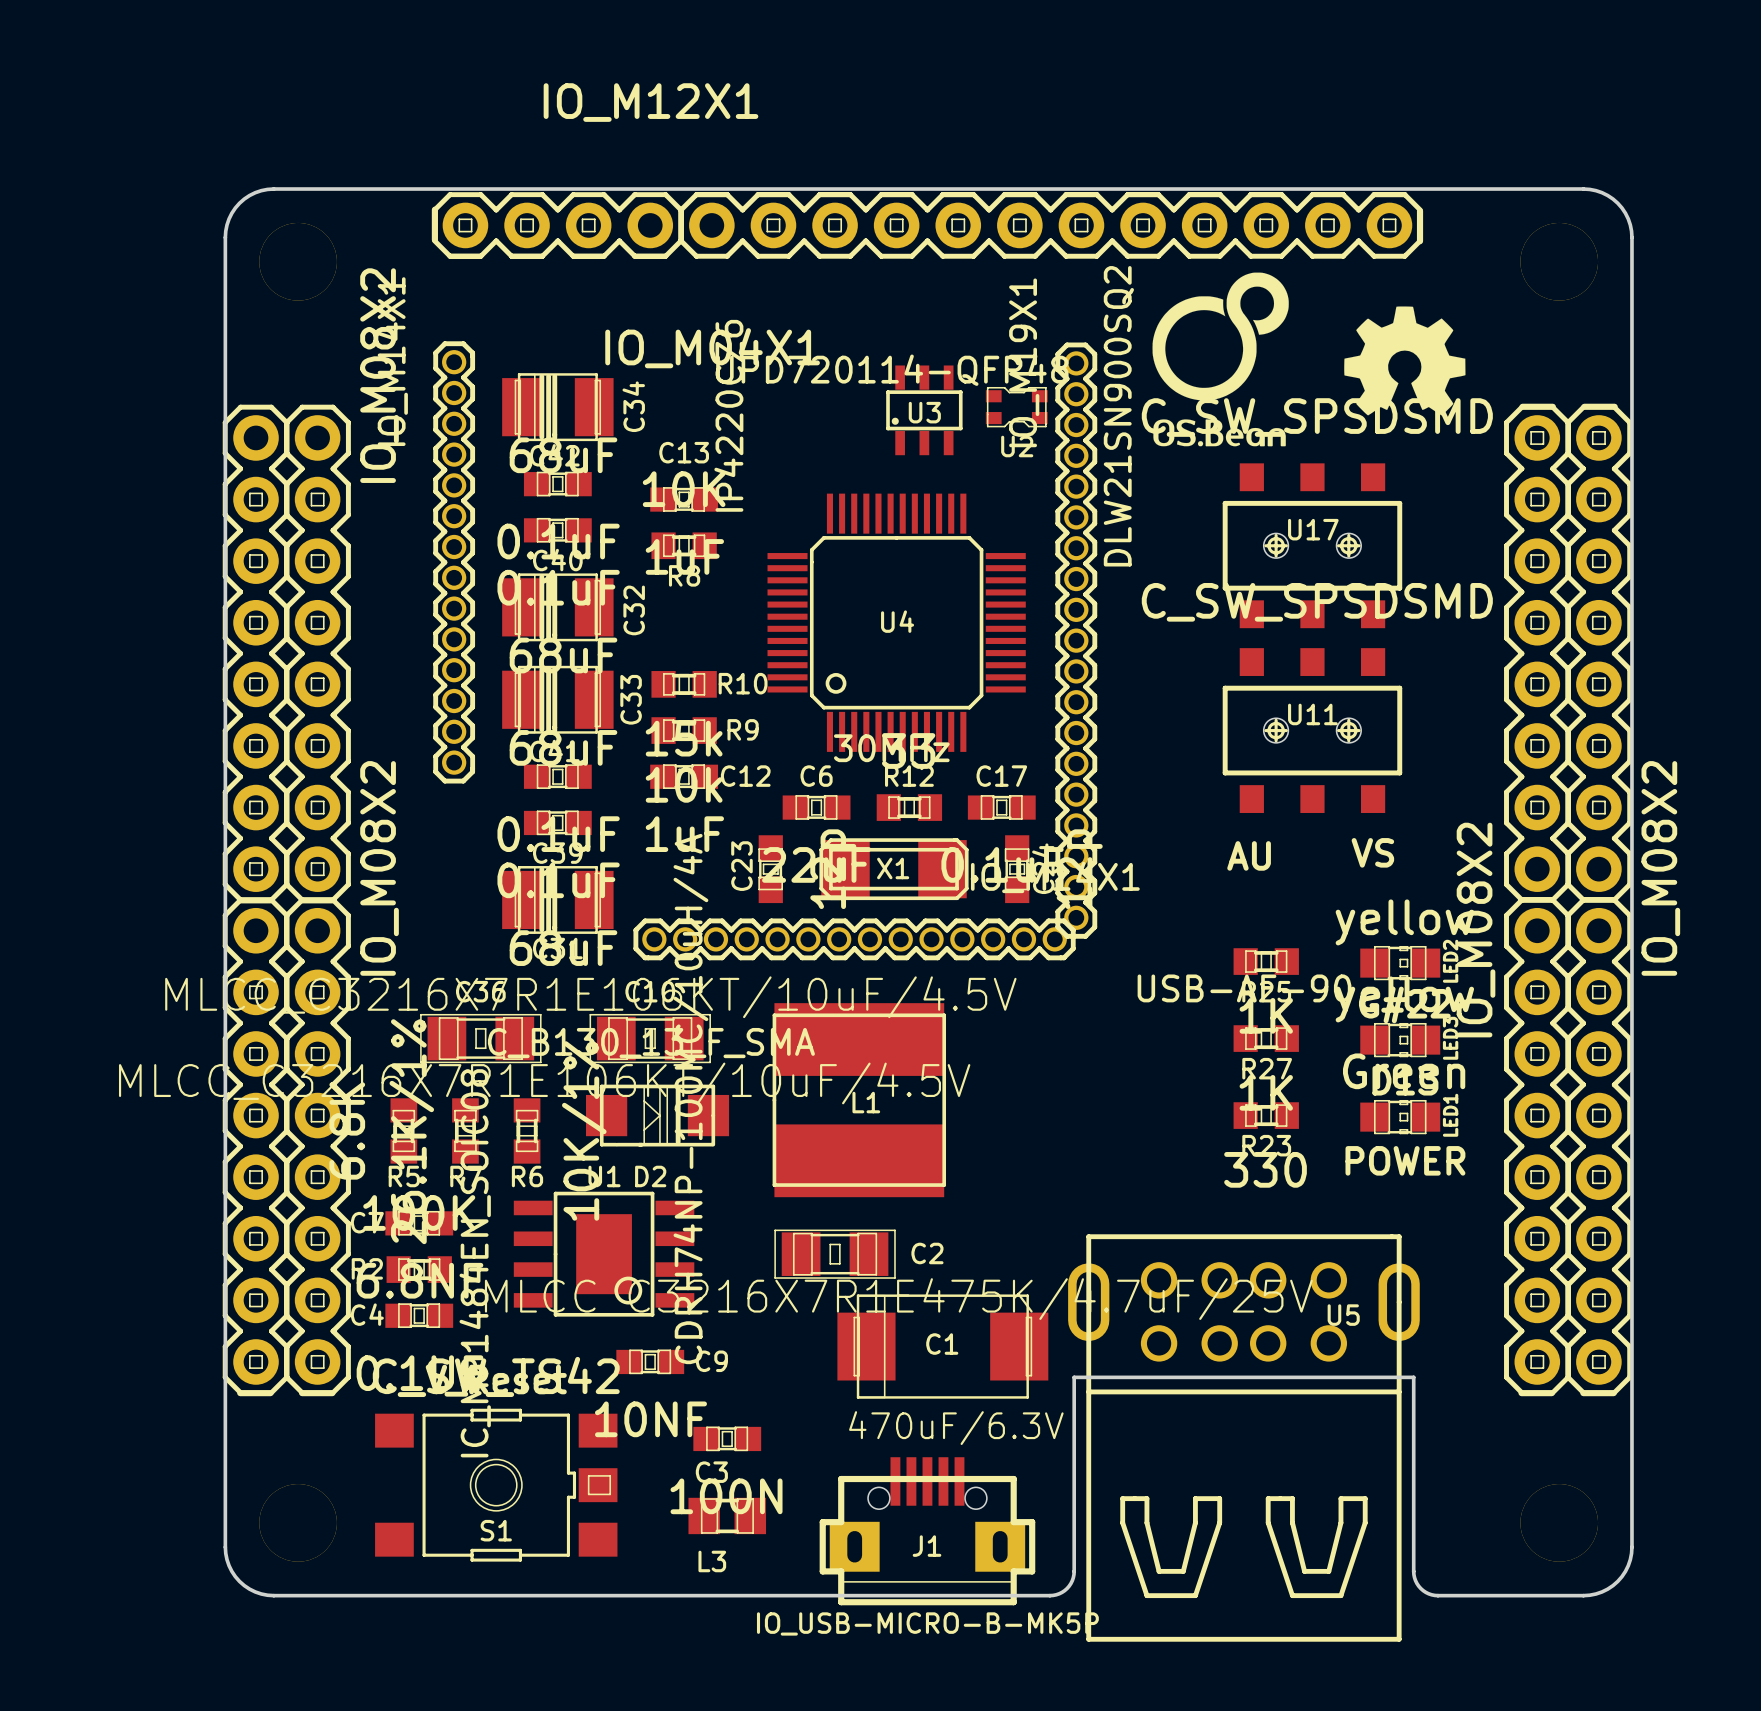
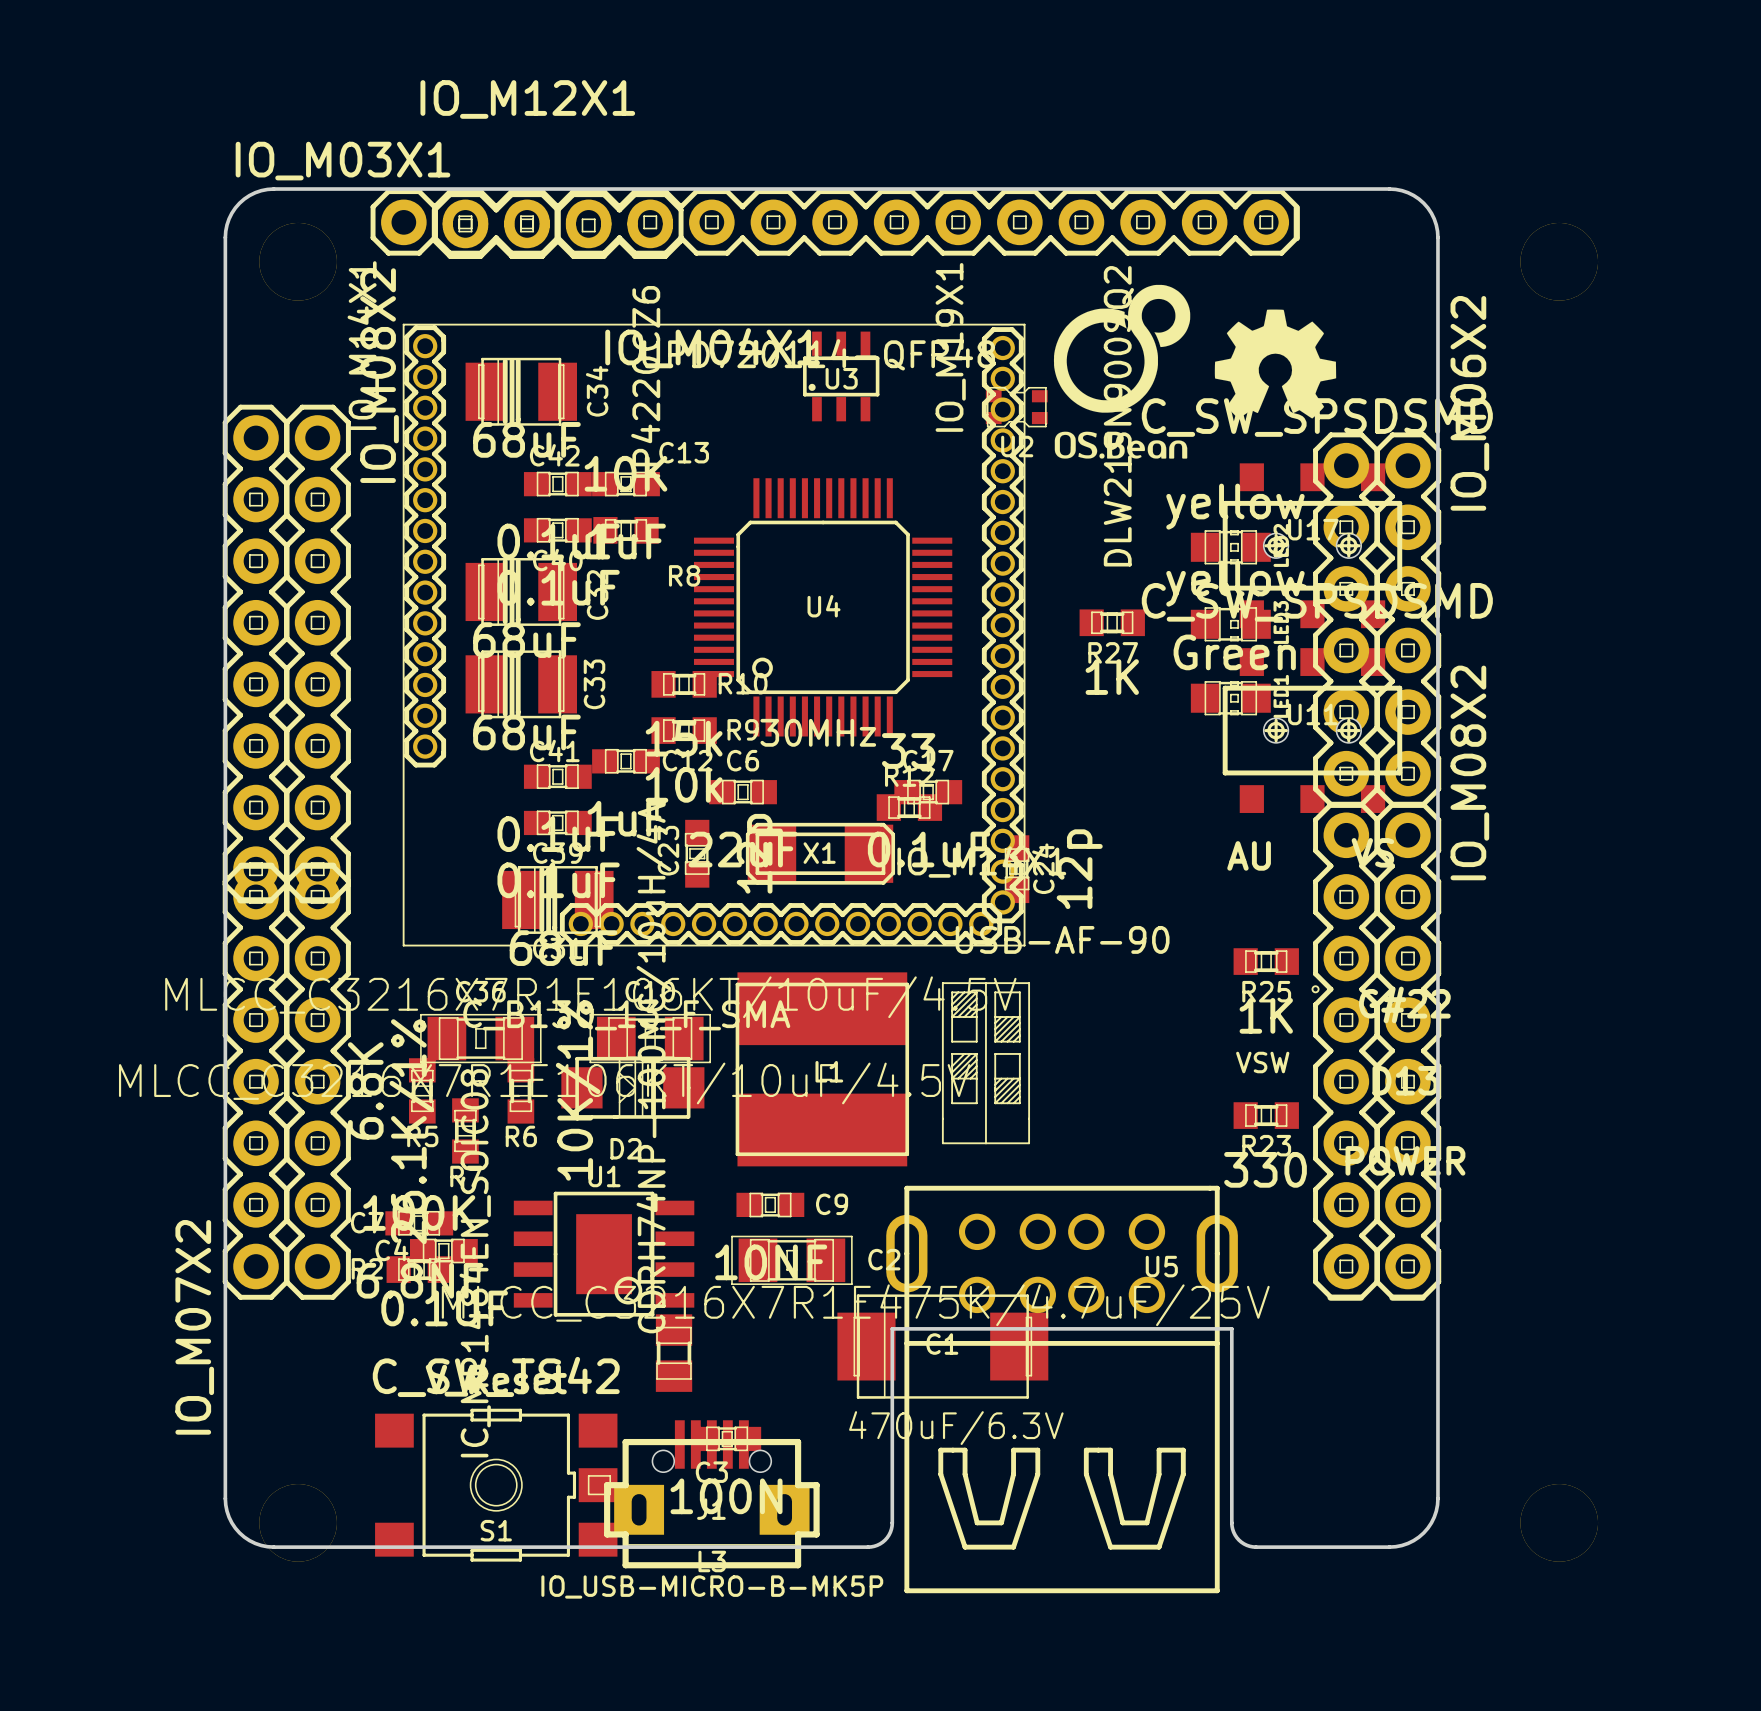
board edge: (1389, 189) (1589, 189) (1607, 195) (1617, 203) (1628, 218) (1631, 231) (1631, 1547) (1628, 1565) (1617, 1581) (1602, 1591) (1583, 1595) (1437, 1595) (1428, 1593) (1420, 1588) (1415, 1580) (1413, 1571) (1413, 1377) (1074, 1377) (1073, 1574) (1067, 1588) (1053, 1595) (267, 1595) (255, 1591) (244, 1585) (235, 1576) (229, 1565) (225, 1547) (225, 1498) -> (1389, 189) (1408, 192) (1423, 203) (1434, 218) (1437, 237) (1437, 1498) (1434, 1517) (1423, 1532) (1408, 1543) (1389, 1547) (1256, 1547) (1246, 1545) (1238, 1540) (1233, 1532) (1231, 1522) (1231, 1328) (892, 1328) (892, 1526) (885, 1540) (871, 1546) (267, 1546) (255, 1543) (239, 1532) (229, 1517) (225, 1498)
part: none -> IO_M03X1 (465, 222)
part position: (1050, 225) -> (927, 222)
line: none -> (403, 324) (1024, 324) (1024, 945) (403, 945) (403, 324)
drawing position: (1220, 359) -> (1122, 371)
drawing position: (1404, 360) -> (1275, 364)
C34 position: (557, 407) -> (521, 391)
U3 position: (924, 410) -> (841, 376)
C13 position: (684, 499) -> (626, 484)
R8 position: (684, 545) -> (626, 530)
part position: (454, 562) -> (425, 546)
C32 position: (557, 607) -> (521, 591)
part: none -> IO_M06X2 (1377, 620)
U4 position: (896, 622) -> (823, 607)
part position: (1076, 640) -> (1002, 625)
part: IO_M08X2 (1568, 653) -> none
C33 position: (557, 699) -> (521, 684)
C12 position: (684, 776) -> (626, 761)
C6 position: (816, 807) -> (743, 792)
C17 position: (1001, 807) -> (928, 792)
C23 position: (770, 869) -> (697, 853)
X1 position: (893, 869) -> (820, 853)
part position: (854, 939) -> (781, 923)
LED2 position: (1400, 963) -> (1230, 547)
line: none -> (942, 983) (942, 1143) (1029, 1143) (1029, 983) (942, 983)
line: none -> (985, 983) (985, 1143)
drawing: none -> [1311, 985, 1320, 994]
line: none -> (958, 992) (952, 998)
line: none -> (964, 992) (952, 1004)
line: none -> (970, 992) (952, 1010)
line: none -> (976, 992) (952, 1017) (976, 1017)
line: none -> (976, 992) (976, 1041) (952, 1041) (952, 992) (976, 992)
line: none -> (976, 998) (958, 1017)
line: none -> (976, 1004) (964, 1017)
line: none -> (976, 1010) (970, 1017)
line: none -> (995, 1017) (1019, 1017) (995, 1041)
line: none -> (1001, 1017) (995, 1023)
line: none -> (1007, 1017) (995, 1029)
line: none -> (1013, 1017) (995, 1035)
line: none -> (1019, 1023) (1001, 1041)
line: none -> (1019, 1029) (1007, 1041)
line: none -> (1019, 1035) (1013, 1041)
R27 position: (1266, 1038) -> (1112, 622)
LED3 position: (1400, 1040) -> (1230, 624)
line: none -> (995, 1041) (995, 992) (1019, 992) (1019, 1041) (995, 1041)
line: none -> (964, 1053) (952, 1066)
line: none -> (970, 1053) (952, 1072)
line: none -> (976, 1053) (952, 1078) (976, 1078)
line: none -> (976, 1053) (976, 1103) (952, 1103) (952, 1053) (976, 1053)
line: none -> (976, 1060) (958, 1078)
text: none -> VSW (1262, 1062)
line: none -> (976, 1066) (964, 1078)
line: none -> (976, 1072) (970, 1078)
line: none -> (995, 1078) (1019, 1078) (995, 1103)
line: none -> (1001, 1078) (995, 1084)
line: none -> (1007, 1078) (995, 1090)
line: none -> (1013, 1078) (995, 1097)
part: none -> IO_M07X2 (286, 1081)
line: none -> (1019, 1084) (1001, 1103)
line: none -> (1019, 1090) (1007, 1103)
line: none -> (1019, 1097) (1013, 1103)
L1 position: (859, 1100) -> (822, 1069)
line: none -> (995, 1103) (995, 1053) (1019, 1053) (1019, 1103) (995, 1103)
D2 position: (657, 1115) -> (632, 1087)
LED1 position: (1400, 1117) -> (1230, 698)
R5 position: (403, 1130) -> (422, 1090)
R6 position: (527, 1130) -> (520, 1090)
part: IO_M08X2 (286, 1146) -> none
part position: (1568, 1146) -> (1377, 1051)
C2 position: (835, 1254) -> (791, 1260)
C4 position: (419, 1315) -> (443, 1250)
C9 position: (650, 1361) -> (770, 1205)
U5 position: (1243, 1438) -> (1062, 1389)
part rotation: 0° (727, 1515) -> 90° clockwise (674, 1353)
part position: (727, 1515) -> (674, 1353)
J1 position: (927, 1531) -> (711, 1494)

